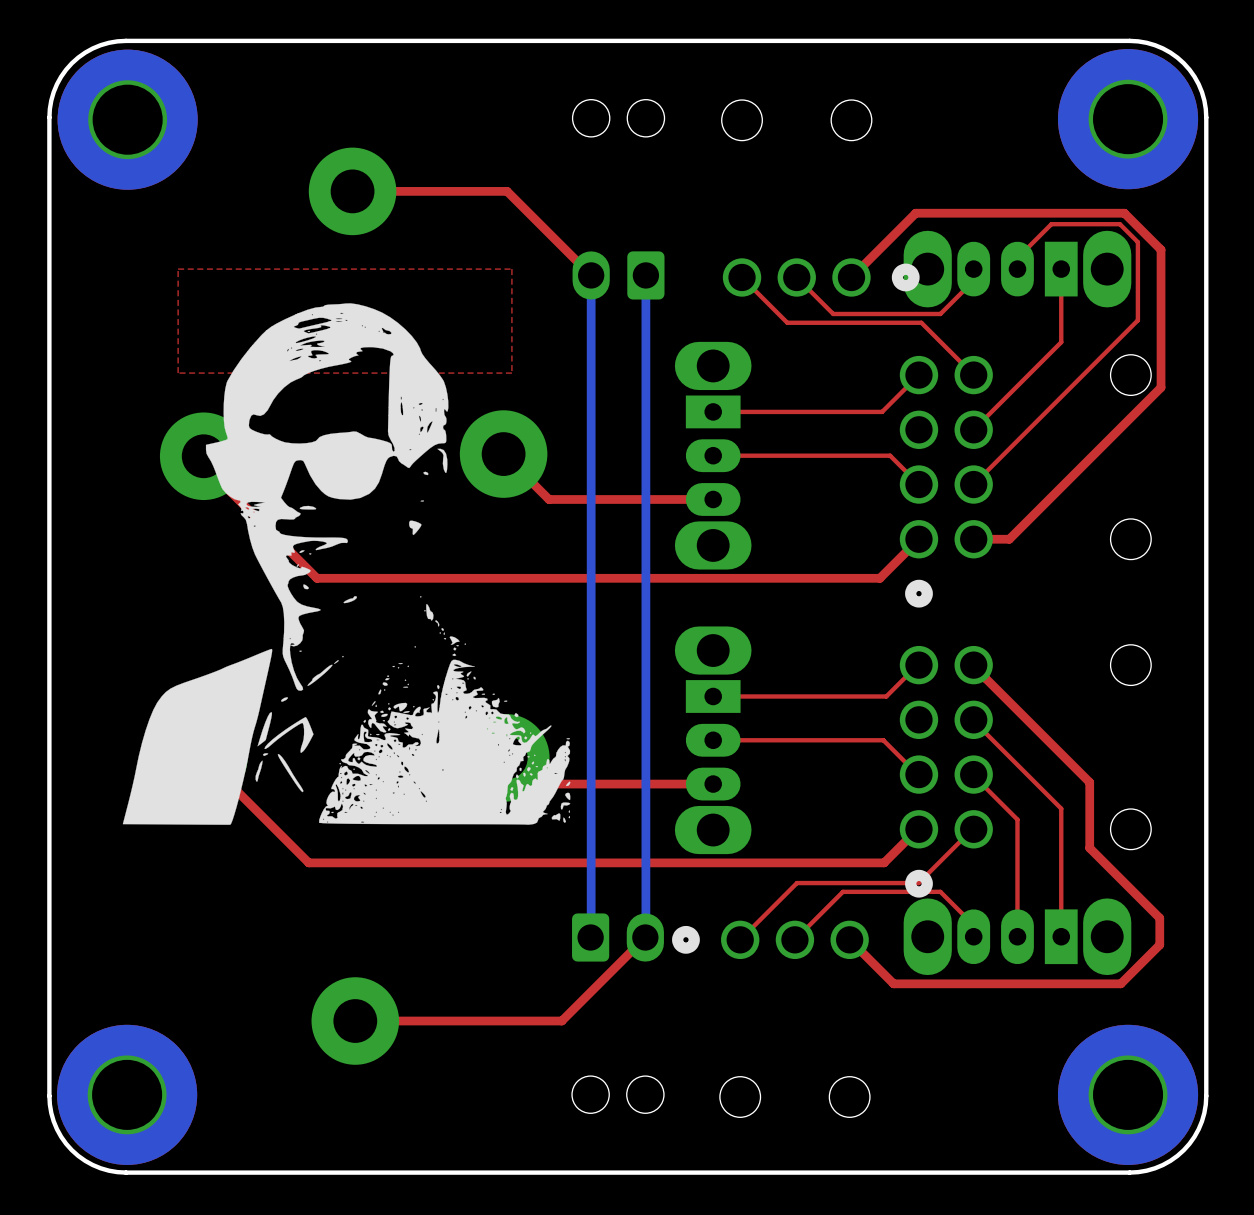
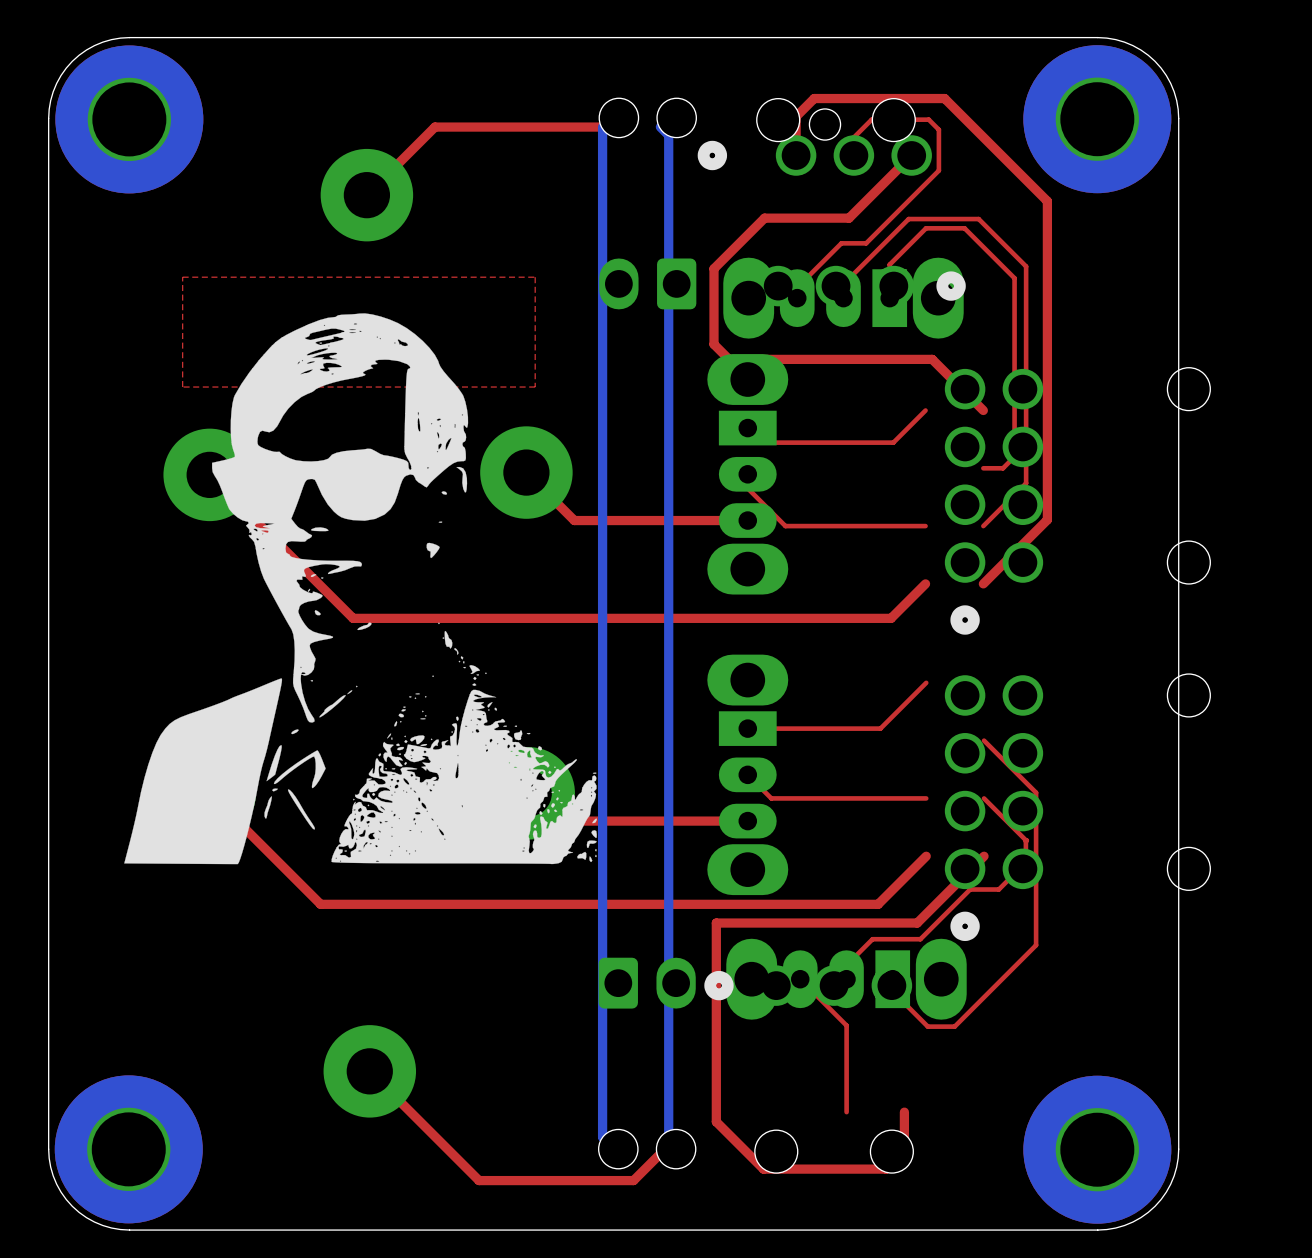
board edge: (1129, 40) (126, 40) (100, 45) (85, 52) (71, 63) (61, 76) (53, 92) (49, 117) (49, 1095) (53, 1121) (61, 1136) (71, 1150) (85, 1160) (100, 1168) (126, 1172) (1129, 1172) (1154, 1168) (1170, 1160) (1183, 1150) (1198, 1129) (1204, 1113) (1206, 1095) (1206, 117) (1204, 100) (1198, 84) (1183, 63) (1162, 48) (1146, 42) (1129, 40) -> (1097, 37) (1124, 42) (1140, 49) (1155, 61) (1166, 75) (1174, 91) (1178, 118) (1178, 1149) (1174, 1175) (1161, 1199) (1148, 1212) (1132, 1222) (1115, 1228) (1097, 1230) (129, 1230) (102, 1225) (79, 1212) (66, 1199) (56, 1184) (50, 1167) (48, 1149) (48, 118) (53, 91) (66, 68) (79, 55) (94, 45) (111, 39) (129, 37) (1097, 37)
part position: (1128, 119) -> (1097, 119)
bottom track: none -> (602, 127) (602, 1137) (610, 1145)
bottom track: none -> (660, 127) (668, 135) (668, 1145)
part: none -> (814, 142)
top track: none -> (853, 155) (853, 137) (871, 119) (928, 119) (938, 129) (938, 170) (866, 243) (841, 243) (797, 287) (797, 298)
top track: none -> (911, 155) (849, 218) (764, 218) (714, 268) (714, 344) (729, 359) (932, 359) (983, 410)
top track: none -> (800, 170) (796, 165) (796, 116) (814, 98) (944, 98) (1047, 201) (1047, 519) (983, 583)
top track: (352, 191) (507, 191) (591, 275) -> (366, 195) (434, 127) (602, 127)
top track: (973, 269) (973, 280) (940, 313) (833, 313) (796, 277) -> none
top track: (1017, 269) (1017, 258) (1051, 224) (1119, 224) (1137, 242) (1137, 320) (973, 484) -> none
part position: (1017, 269) -> (843, 298)
top track: (1061, 269) (1061, 342) (973, 429) -> none
bottom track: (591, 275) (590, 937) -> none
bottom track: (645, 275) (645, 937) -> none
top track: (742, 277) (787, 322) (921, 322) (973, 375) -> none
top track: (851, 277) (915, 213) (1124, 213) (1161, 249) (1161, 387) (1009, 539) (973, 539) -> none
top track: none -> (843, 298) (843, 284) (908, 219) (978, 219) (1026, 266) (1026, 483) (983, 526)
top track: none -> (889, 298) (889, 264) (926, 228) (964, 228) (1014, 278) (1014, 456) (1003, 468) (983, 468)
top track: (918, 375) (882, 411) (713, 411) -> none
top track: none -> (925, 410) (893, 442) (748, 442)
top track: (713, 455) (890, 455) (918, 484) -> none
top track: none -> (209, 474) (353, 618) (891, 618) (925, 583)
top track: (208, 469) (317, 578) (879, 578) (918, 539) -> none
top track: none -> (748, 488) (785, 526) (925, 526)
top track: (918, 665) (886, 696) (838, 696) -> (926, 682) (880, 728)
top track: (972, 665) (1089, 782) (1089, 848) (1159, 918) (1159, 944) (1120, 983) (893, 983) (849, 939) -> none
top track: none -> (984, 740) (1036, 792) (1036, 945) (954, 1026) (927, 1026) (892, 991) (892, 979)
top track: (972, 719) (1061, 808) (1061, 936) -> none
top track: (713, 740) (883, 740) (918, 774) -> (747, 774) (771, 798) (926, 798)
top track: none -> (984, 798) (1026, 840) (1025, 862) (998, 889) (970, 889) (920, 939) (872, 939) (846, 965) (846, 979)
top track: (972, 774) (1017, 819) (1017, 936) -> none
top track: none -> (984, 856) (917, 923) (716, 923) (716, 1121) (763, 1169) (886, 1169) (904, 1150) (904, 1112)
top track: (918, 829) (884, 862) (836, 862) -> (926, 856) (878, 904)
top track: (973, 829) (918, 883) (796, 883) (740, 939) -> none
top track: none -> (800, 979) (846, 1025) (846, 1112)
top track: (973, 936) (973, 925) (940, 891) (842, 891) (794, 939) -> none
part position: (1017, 936) -> (846, 979)
top track: (645, 937) (561, 1021) (355, 1021) -> (668, 1145) (633, 1180) (479, 1180) (369, 1071)
part position: (1128, 1094) -> (1097, 1149)

